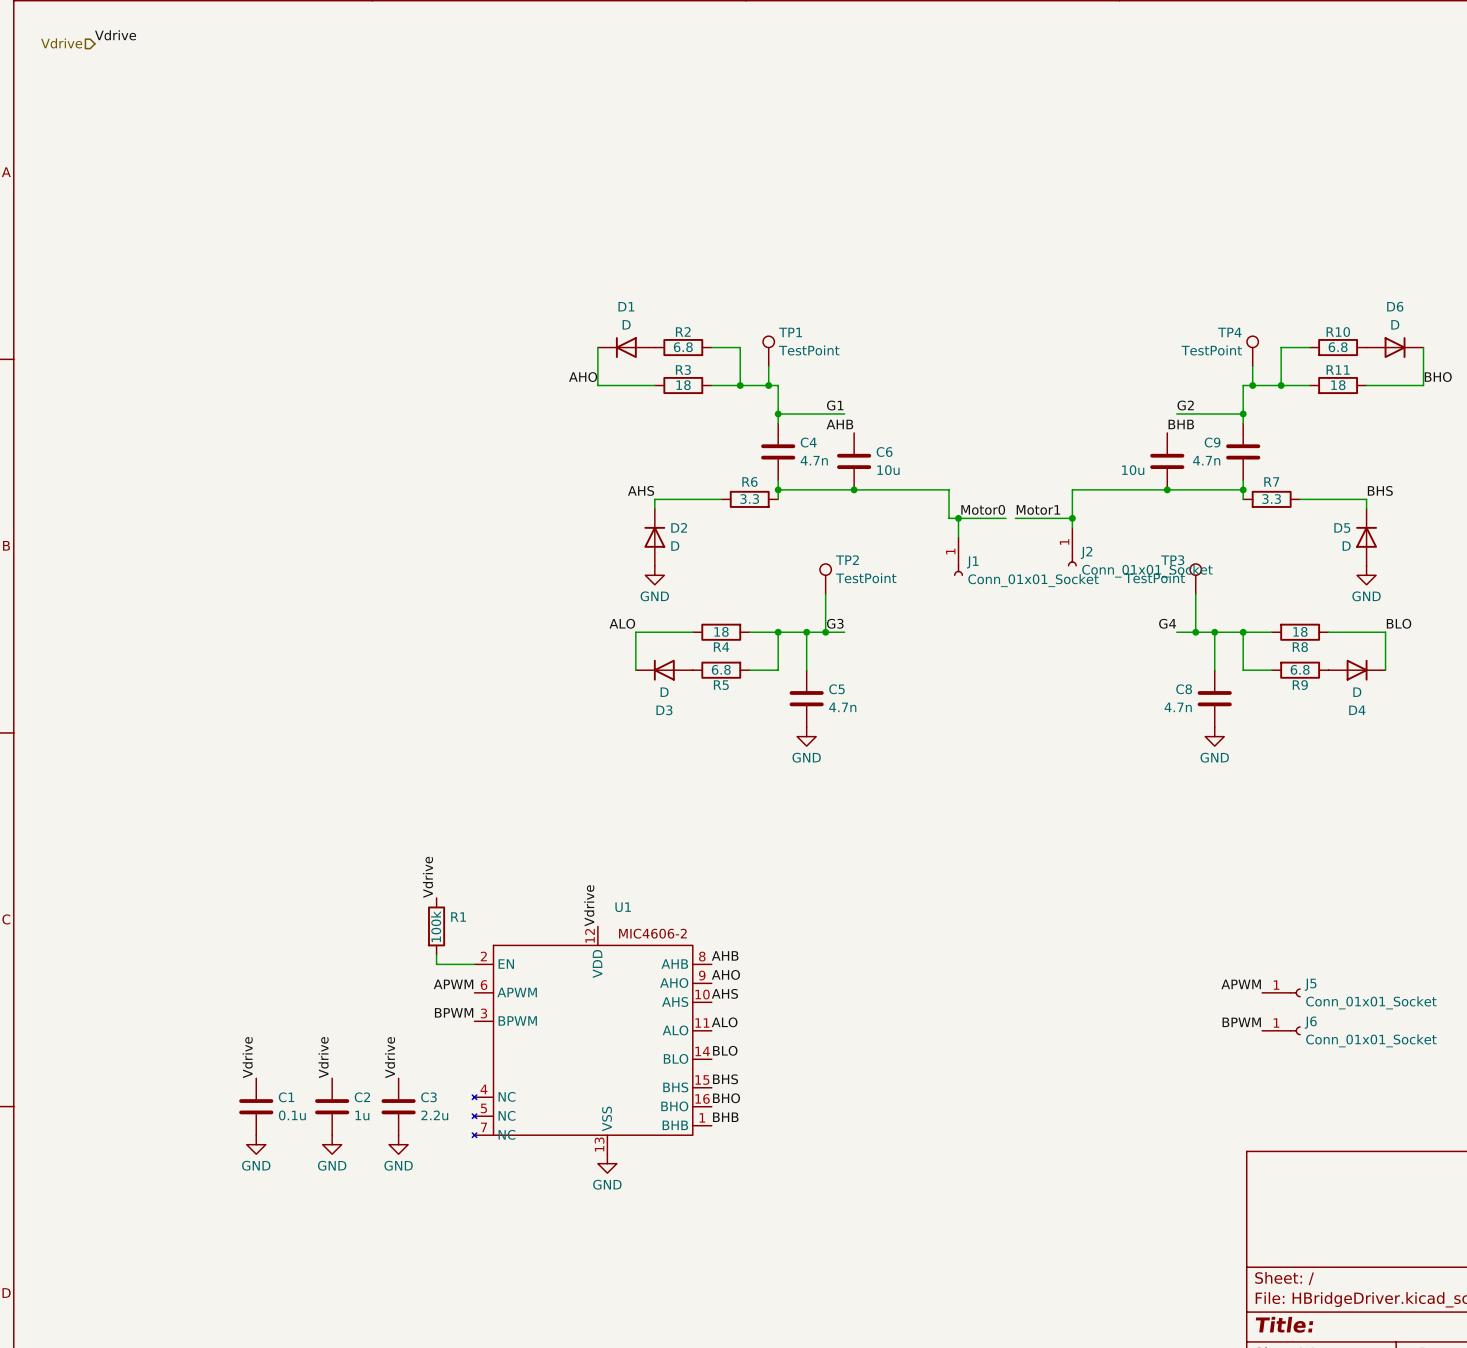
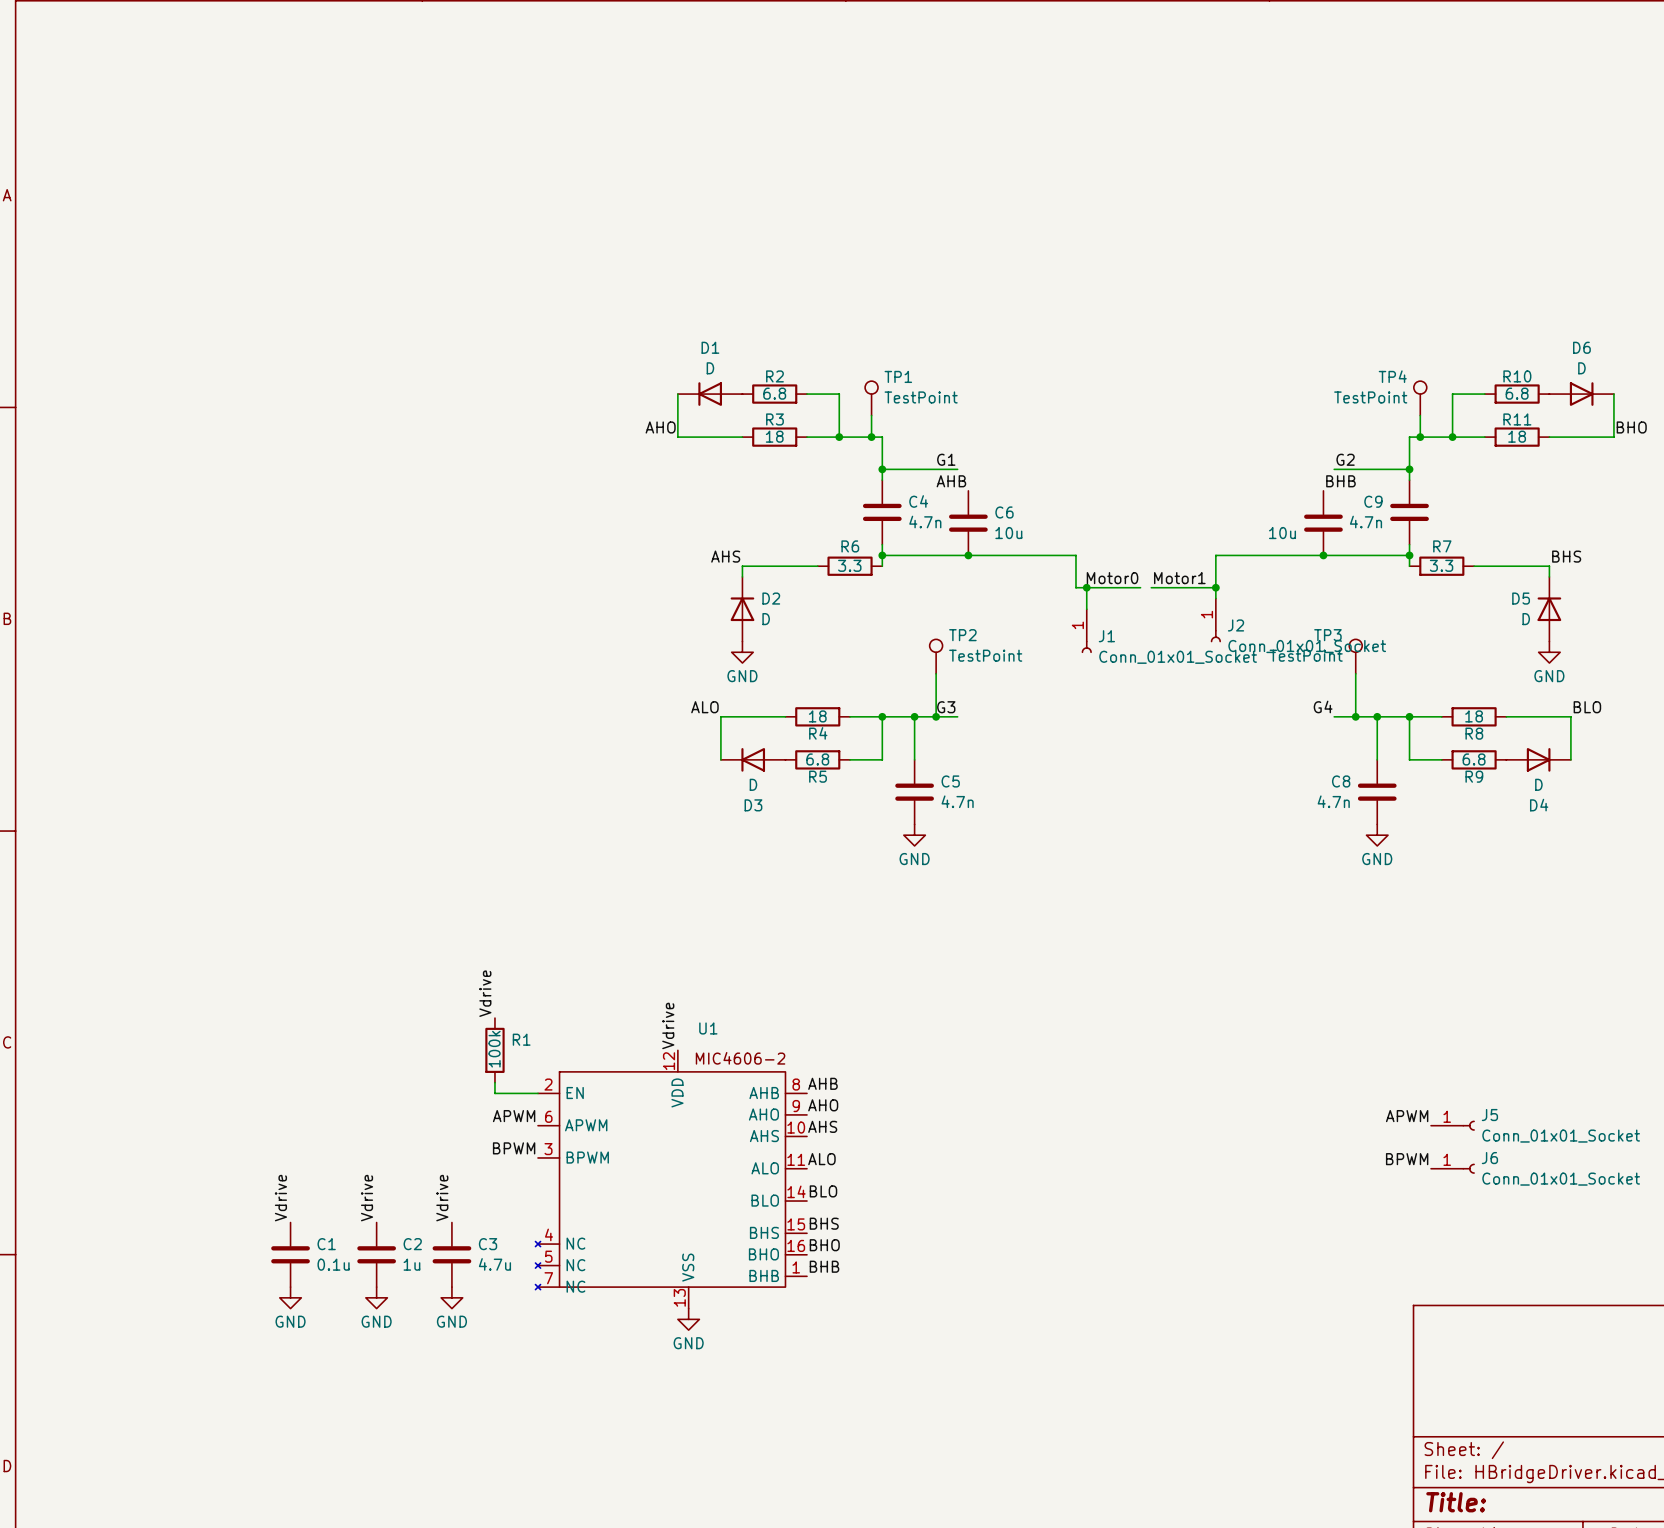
label: Vdrive (115, 35) -> none
hierarchical label: Vdrive (61, 43) -> none
C3 value: 2.2u (434, 1115) -> 4.7u (494, 1264)

